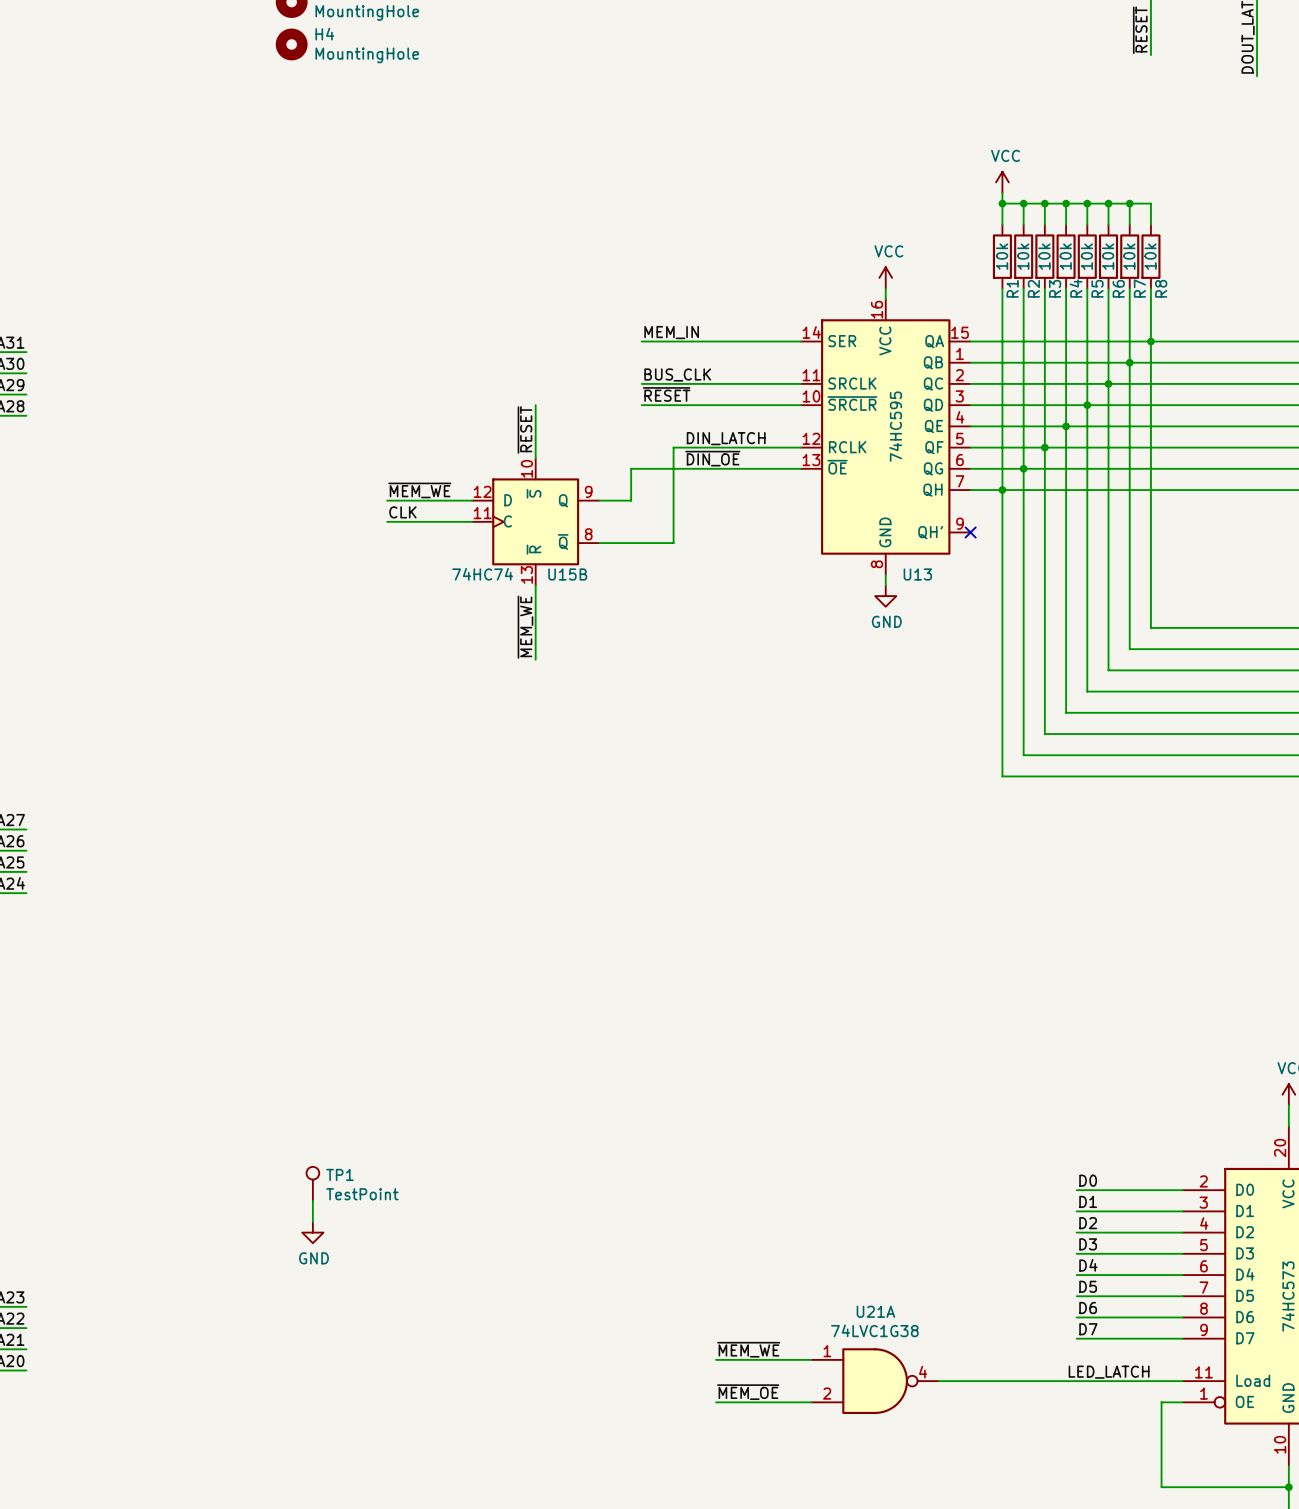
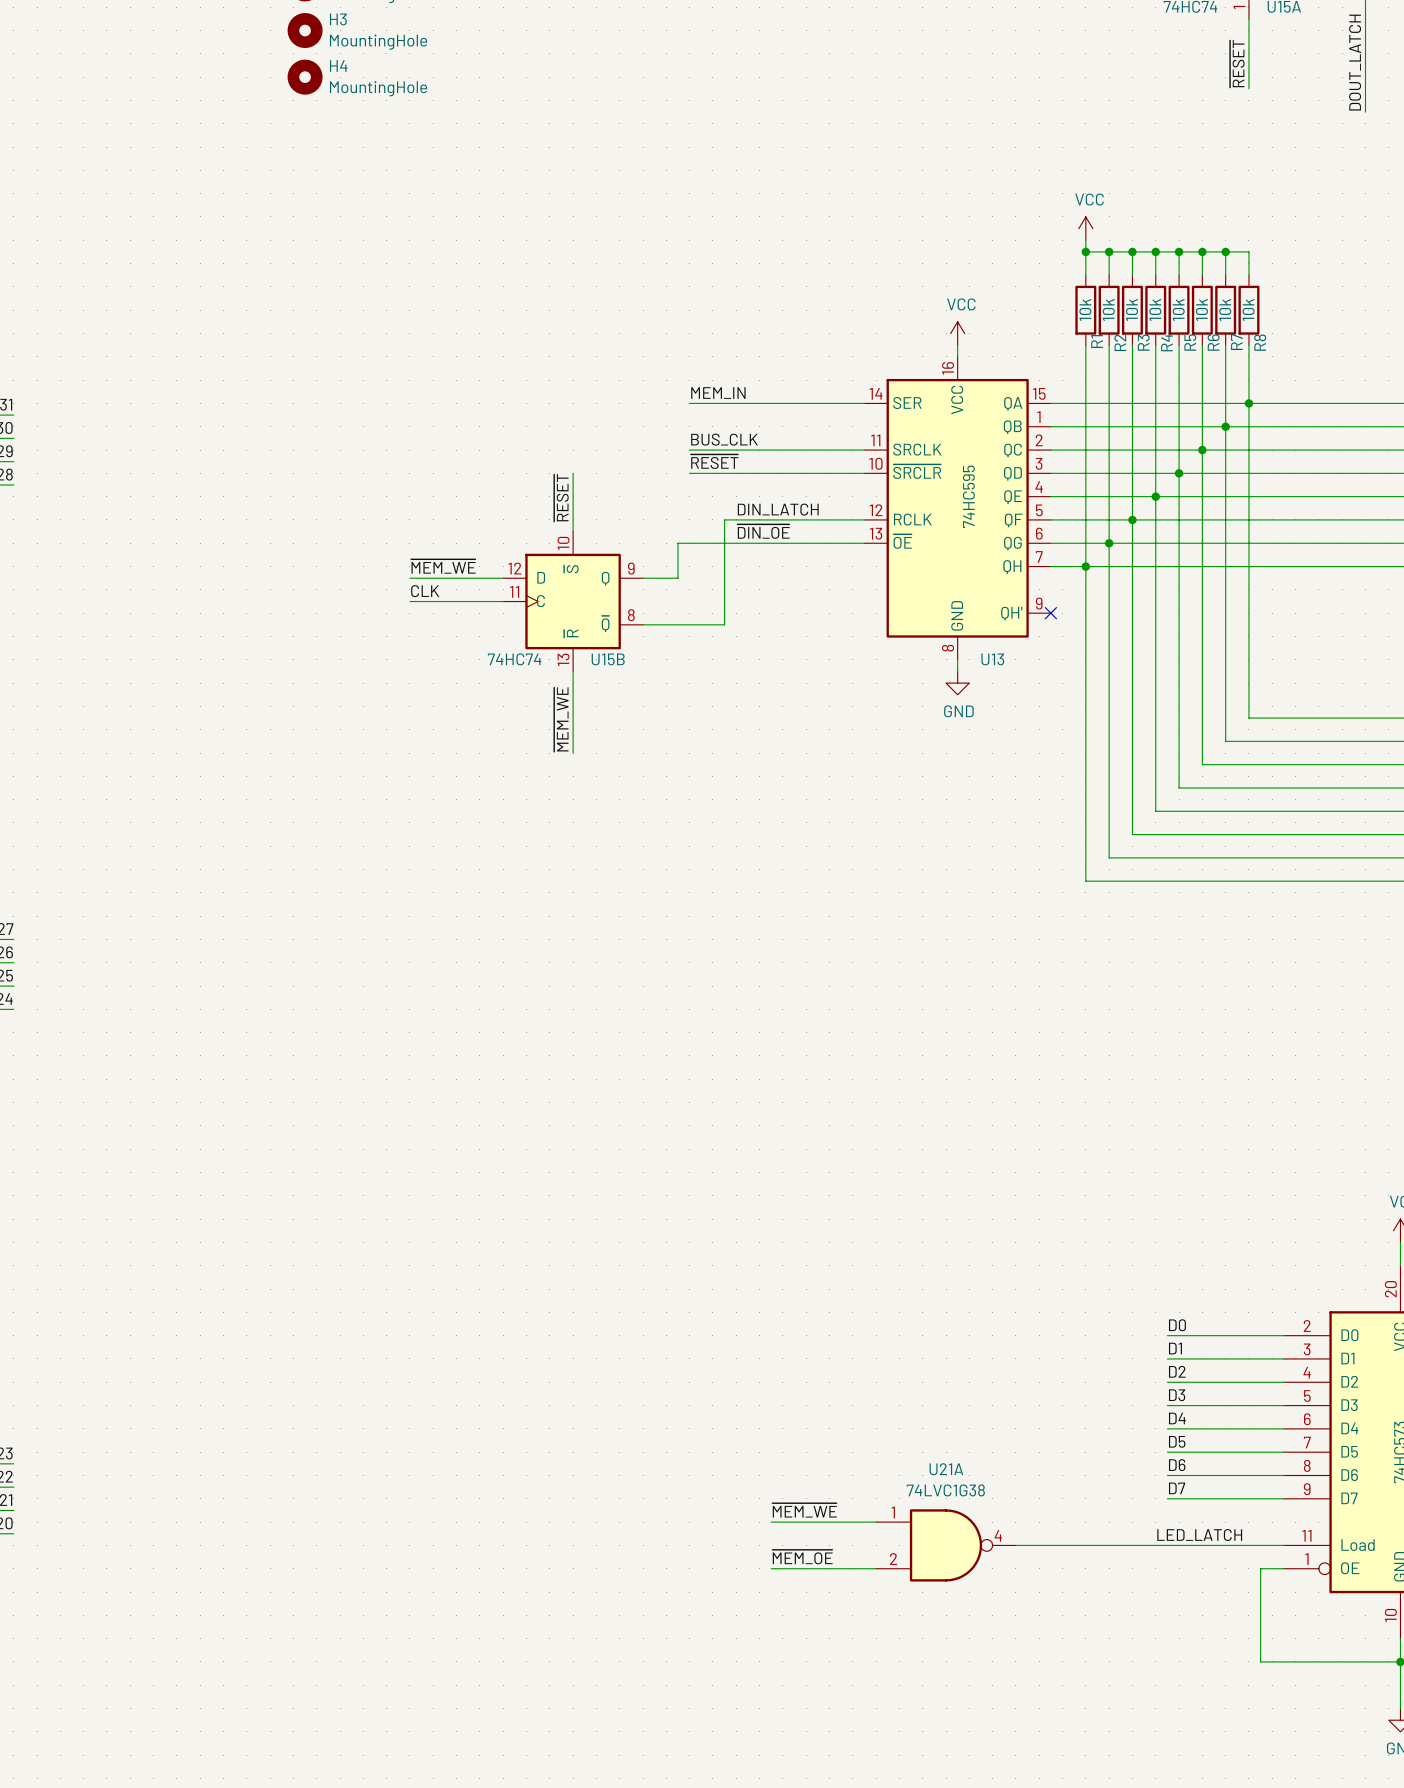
TP1: TestPoint (312, 1183) -> none
wire: (312, 1200) (312, 1222) -> none
power symbol: GND (312, 1232) -> none

